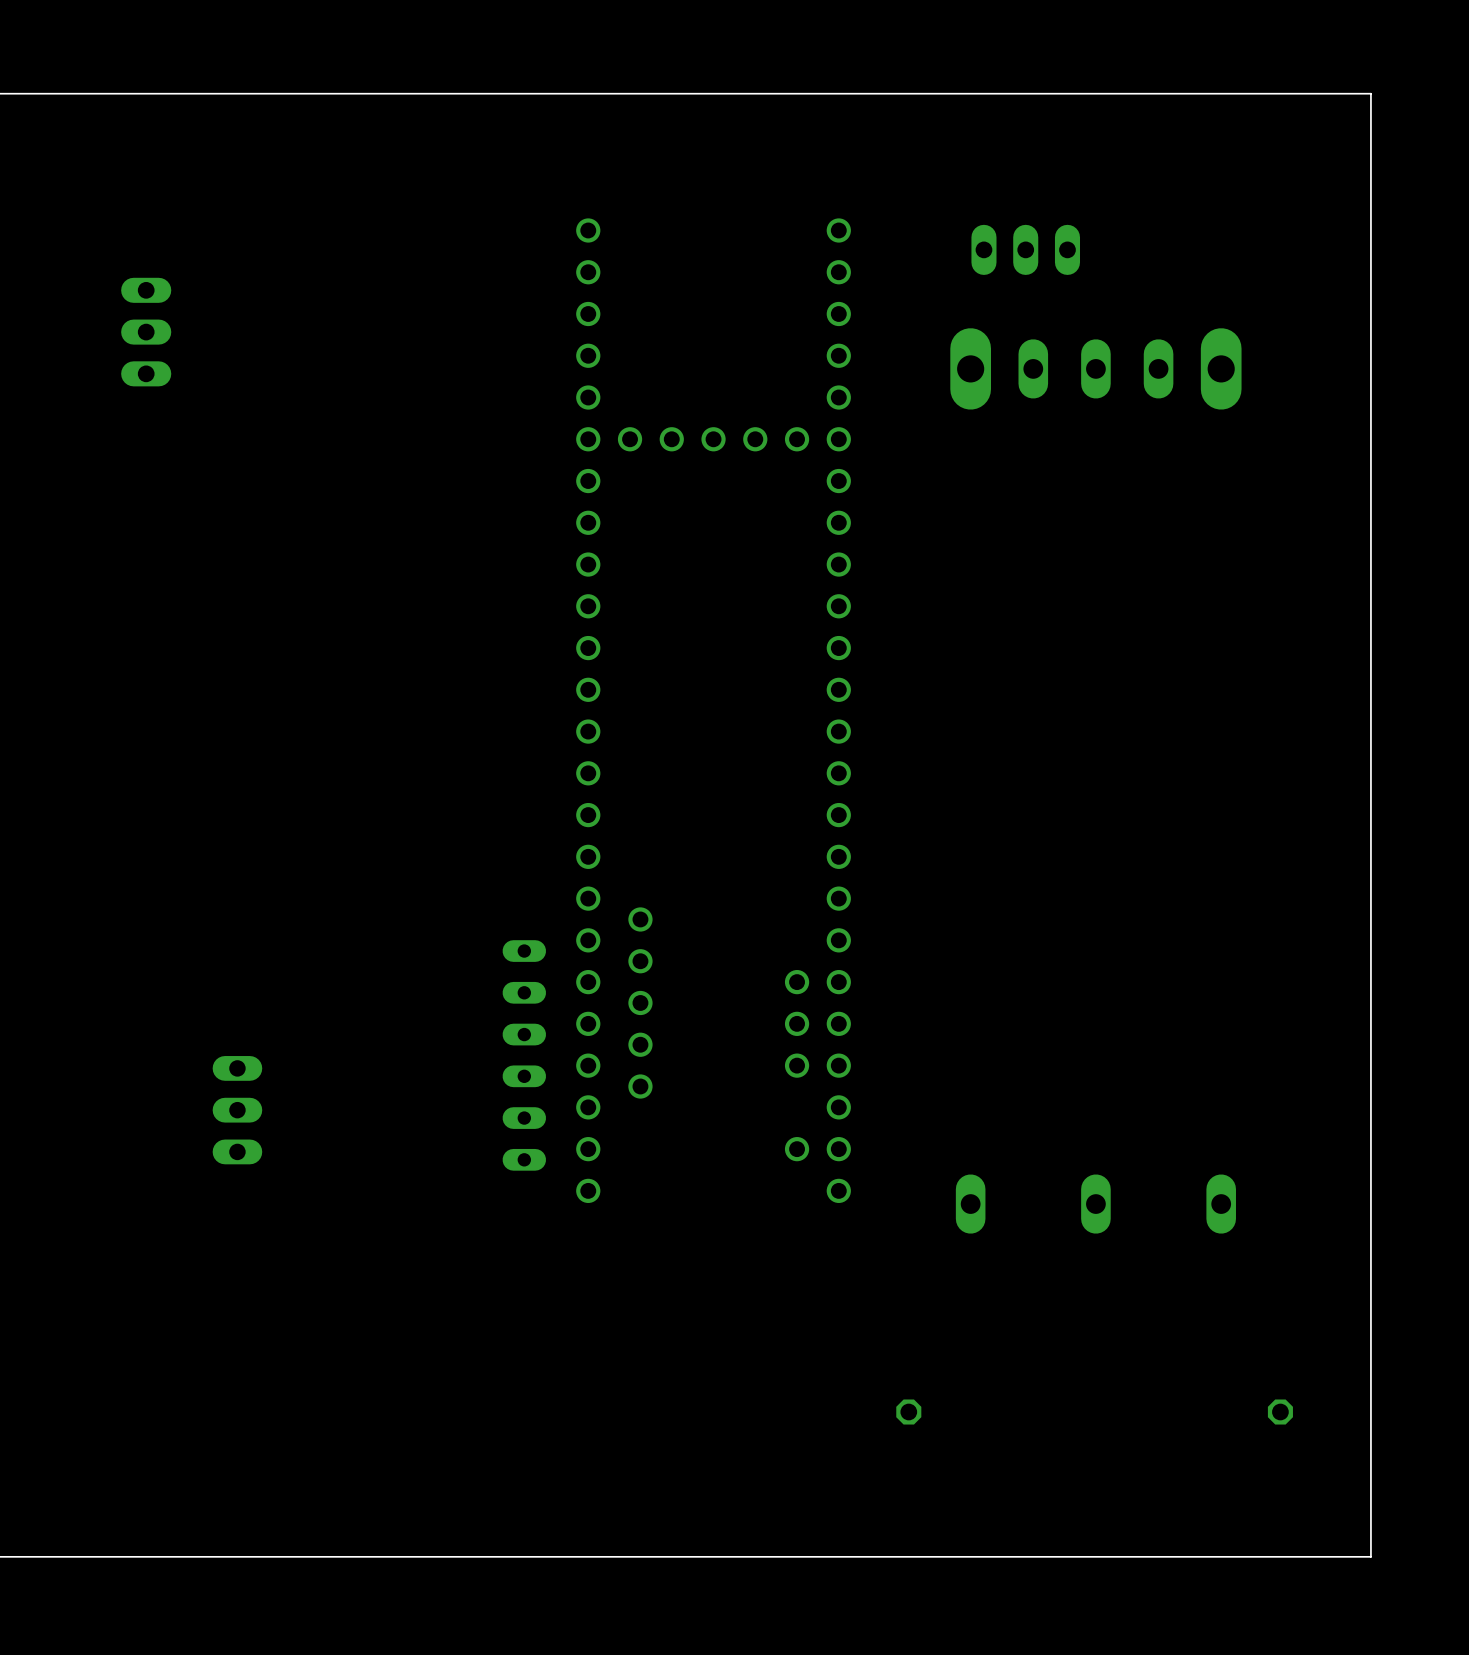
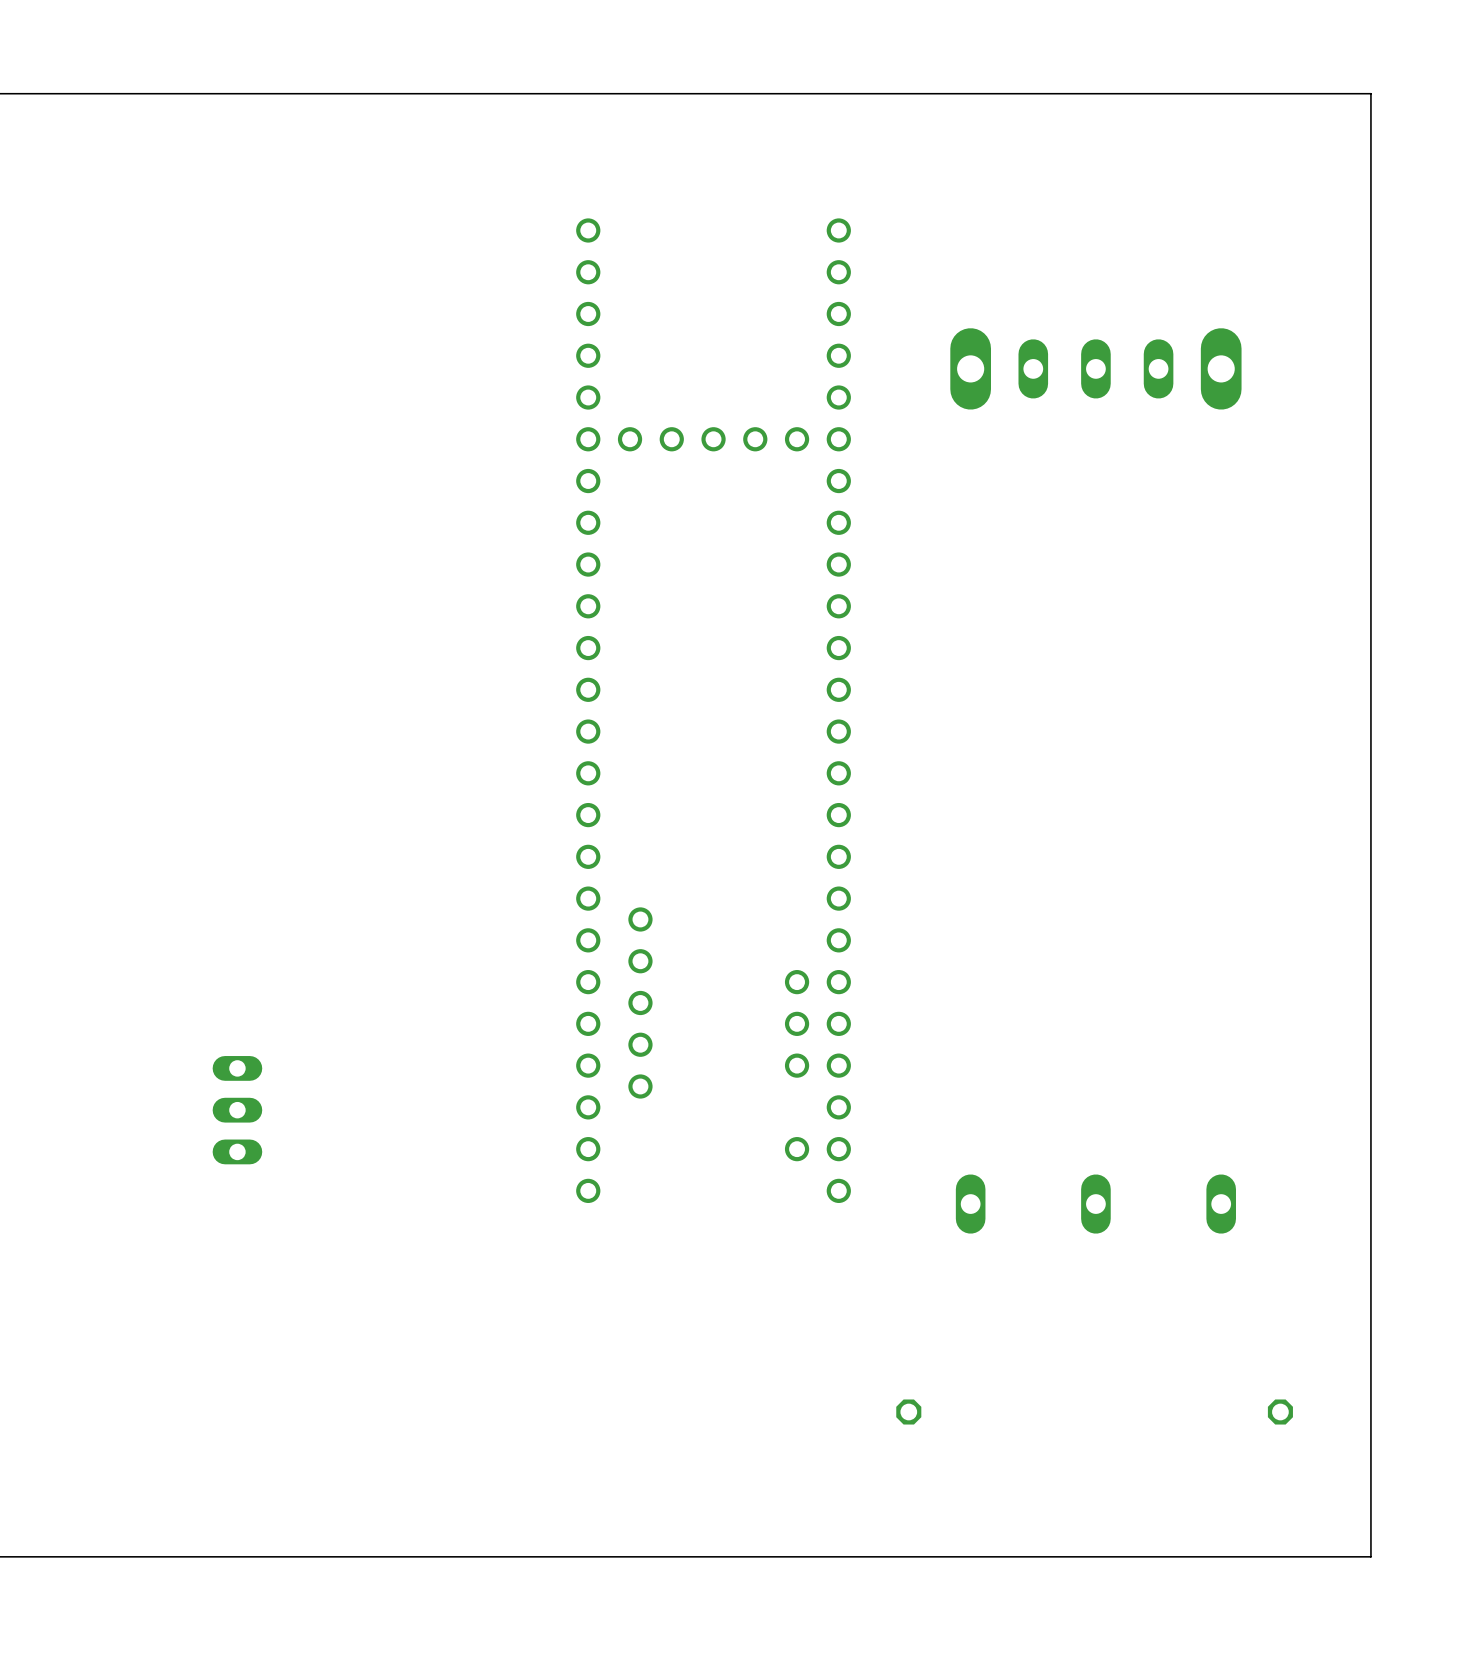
part: (1025, 249) -> none
part: (146, 332) -> none
part: (524, 1055) -> none

